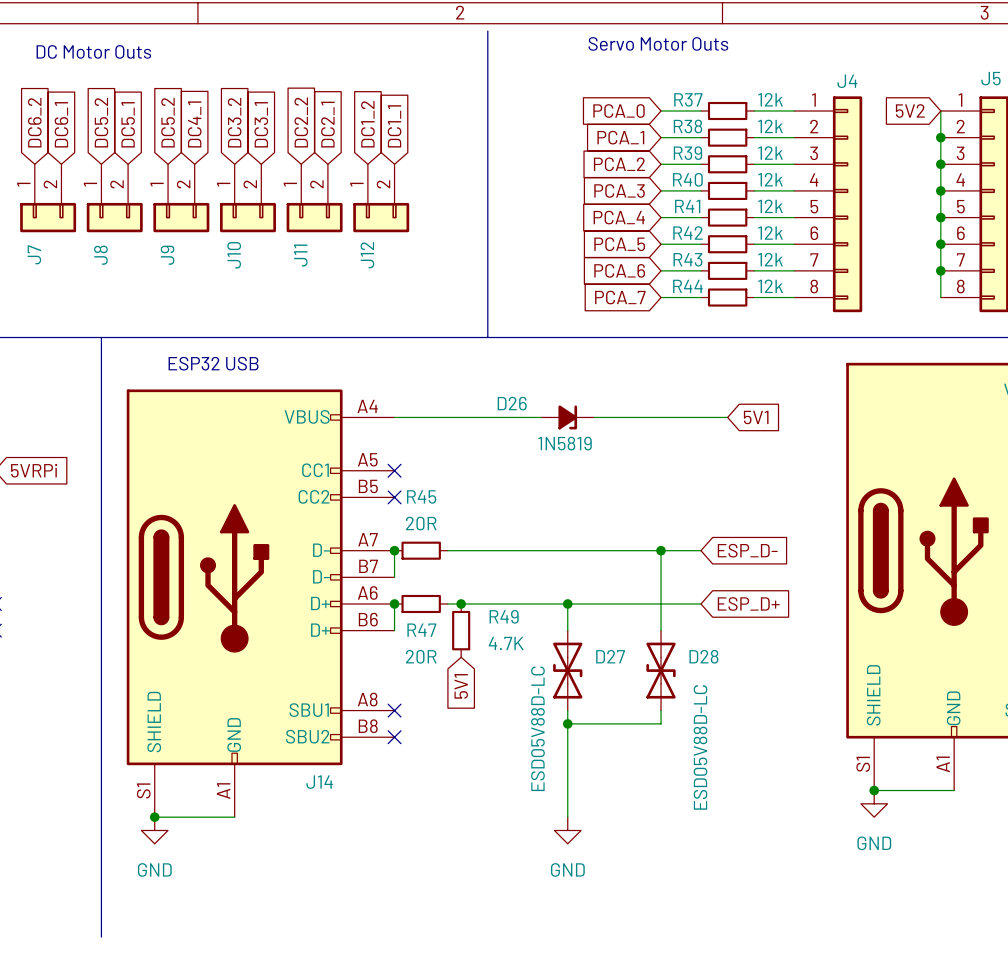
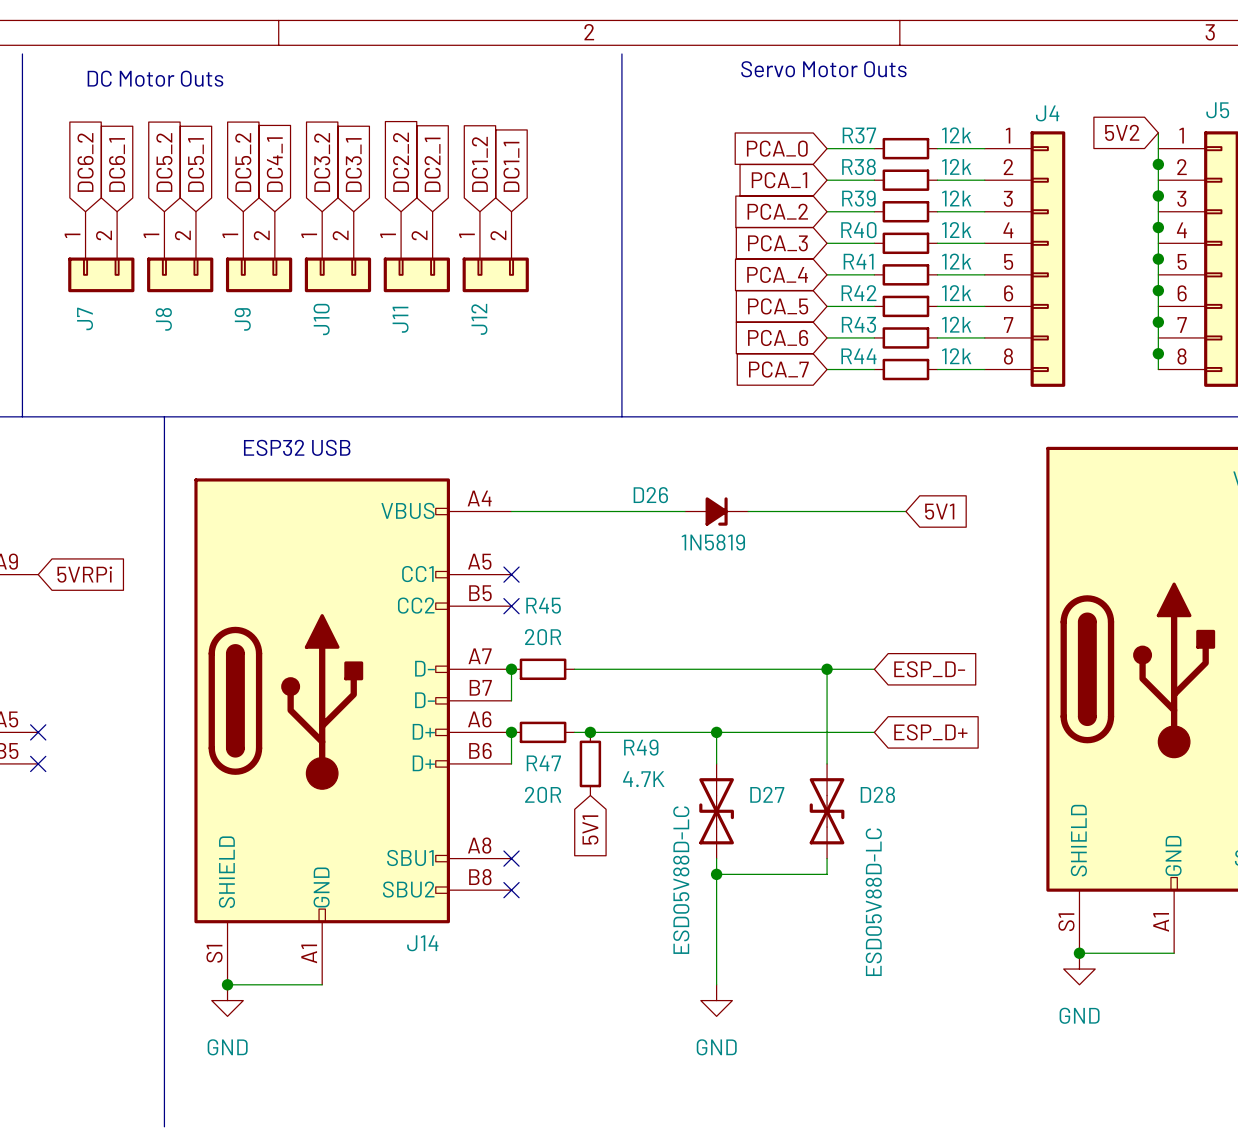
wire: none -> (1158, 132) (1158, 148)
global label position: 5V2 (910, 110) -> 5V2 (1122, 132)
junction: none -> (1158, 164)
junction: (940, 137) -> none
junction: none -> (1158, 195)
junction: (940, 164) -> none
junction: none -> (1158, 227)
junction: (940, 190) -> none
junction: none -> (1158, 259)
junction: (940, 217) -> none
junction: none -> (1158, 290)
junction: (940, 244) -> none
junction: none -> (1158, 322)
junction: (940, 270) -> none
junction: none -> (1158, 353)

